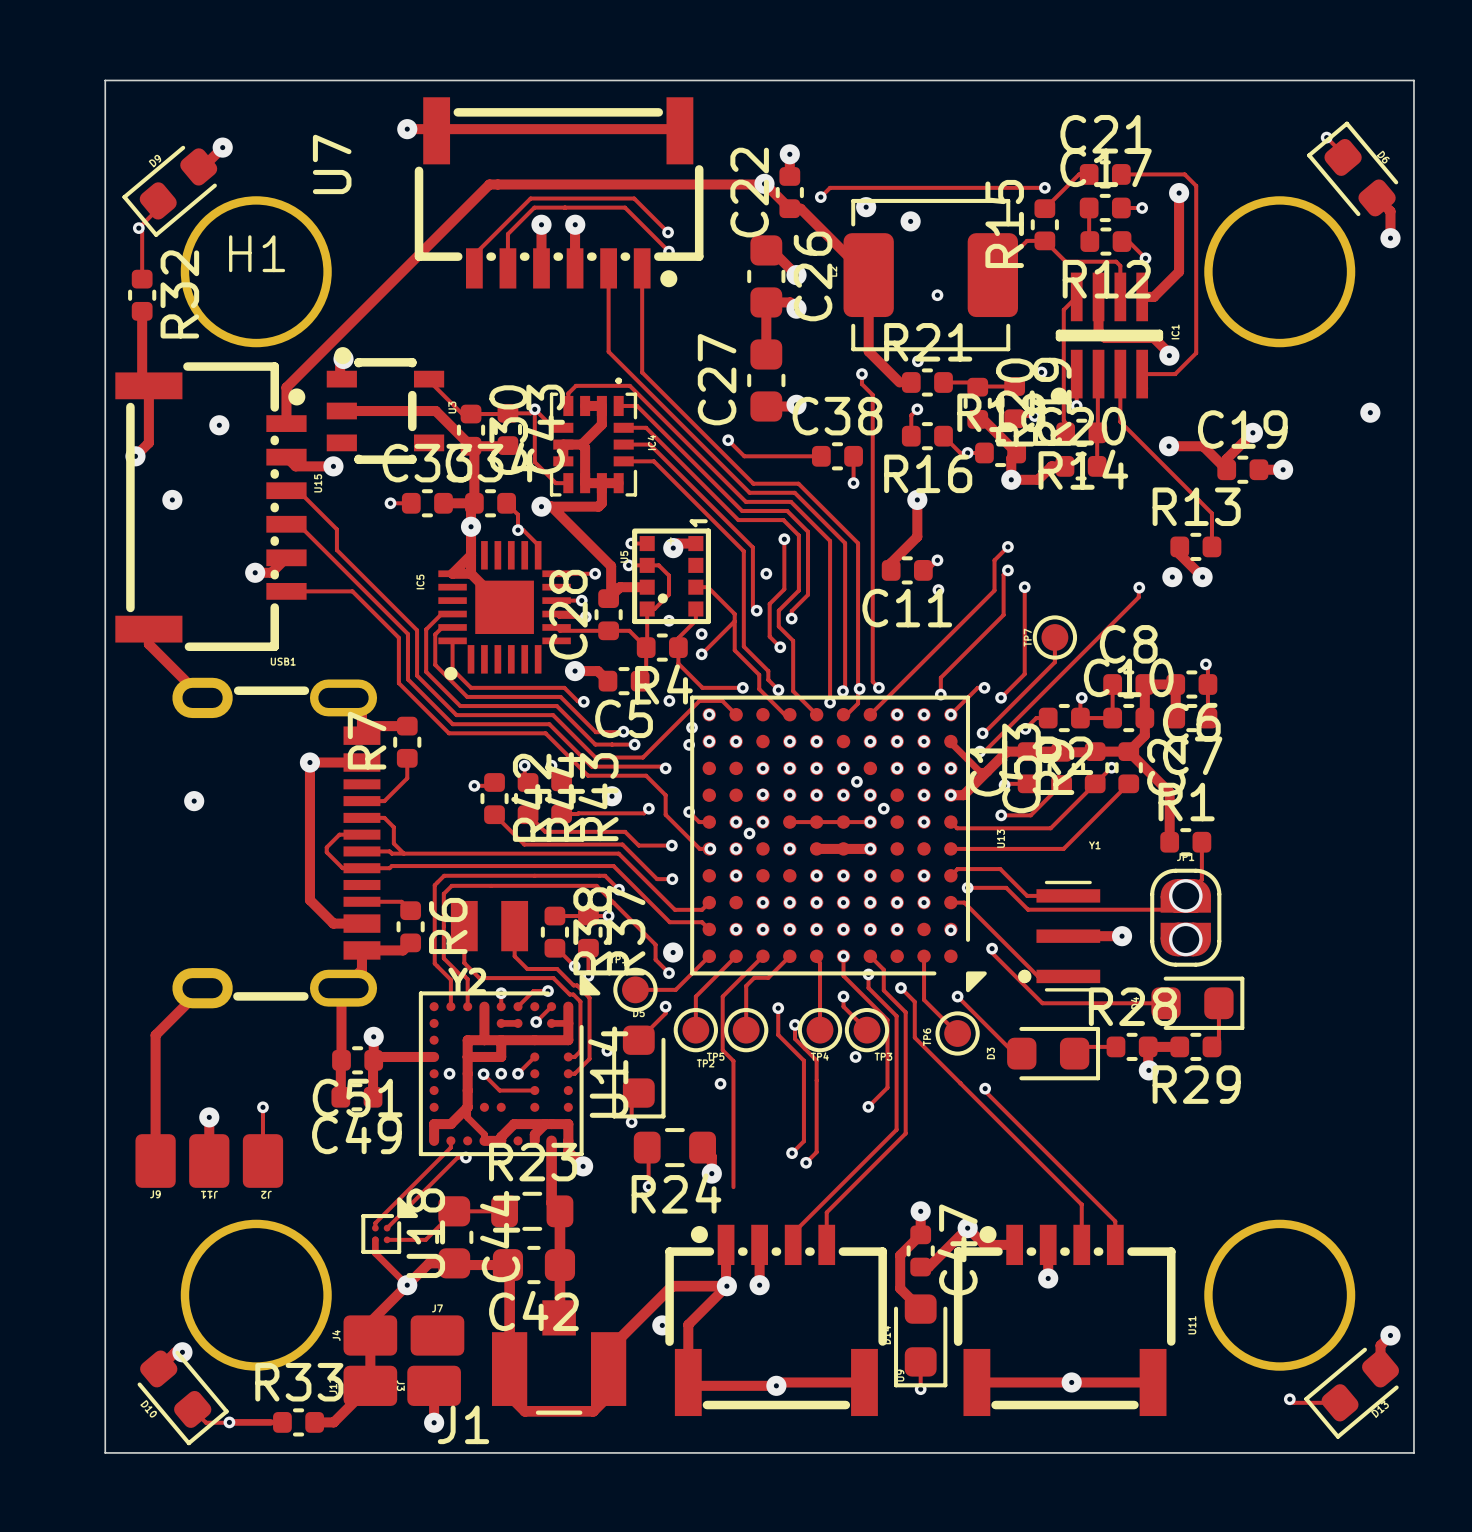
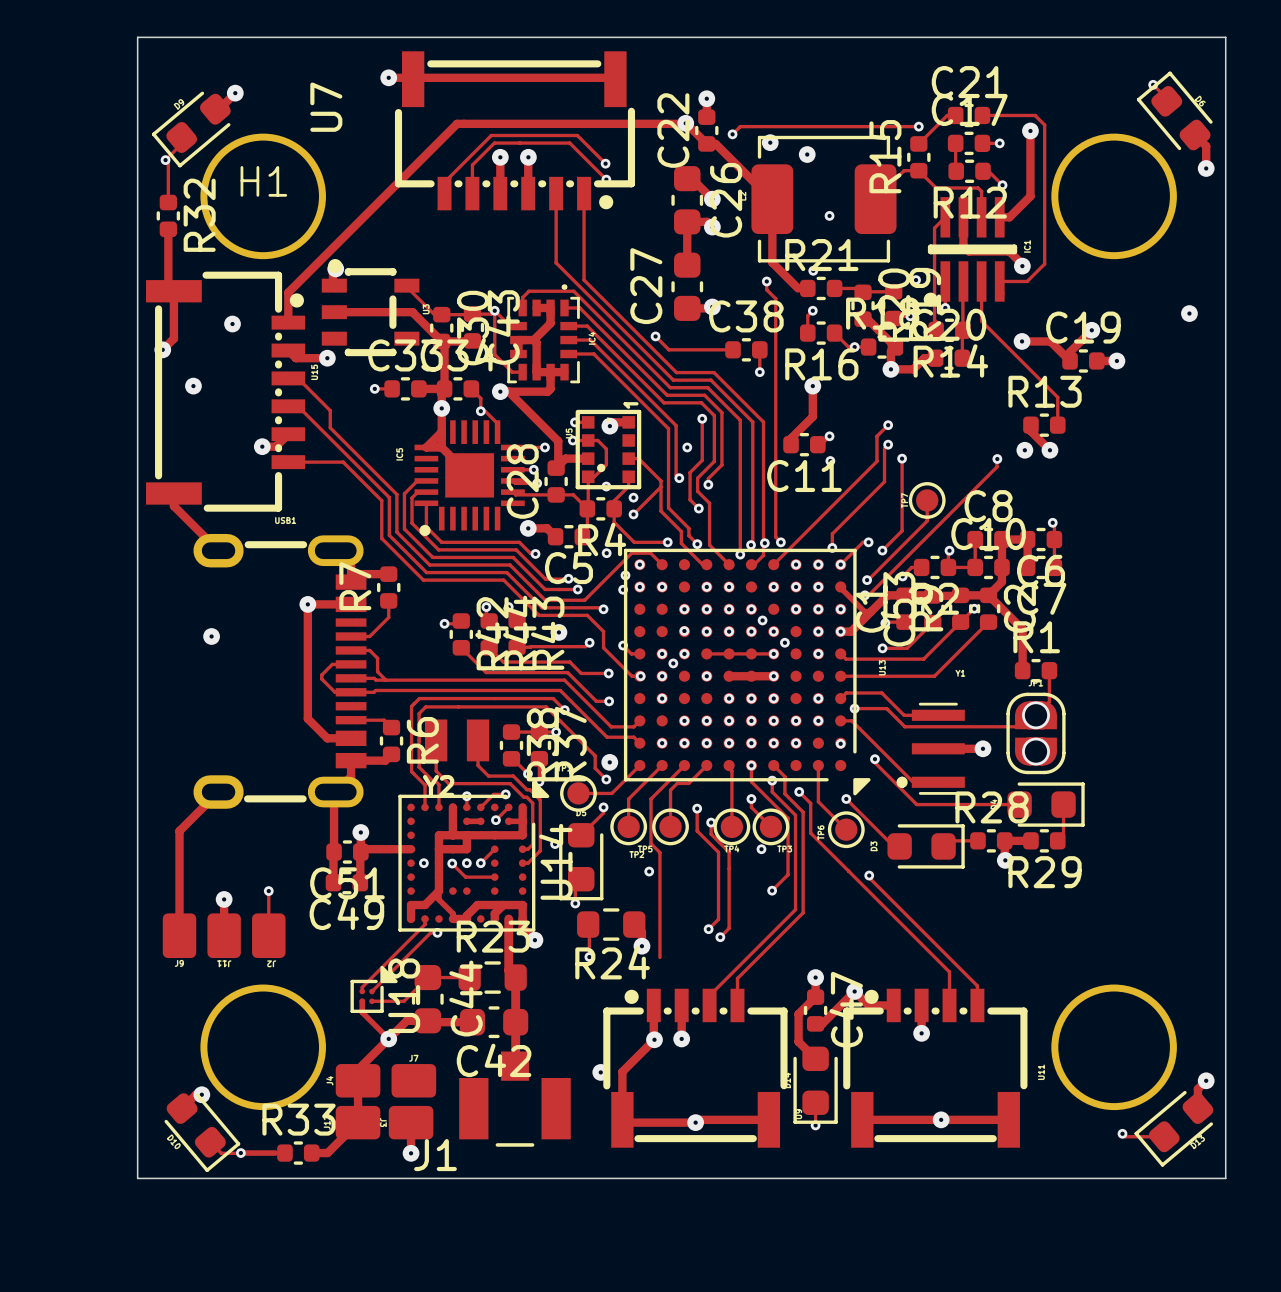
track: (507, 1265) (509, 1266) (509, 1395) (525, 1411) (593, 1411) (608, 1395) (608, 1349) (672, 1286) (726, 1286) -> none

